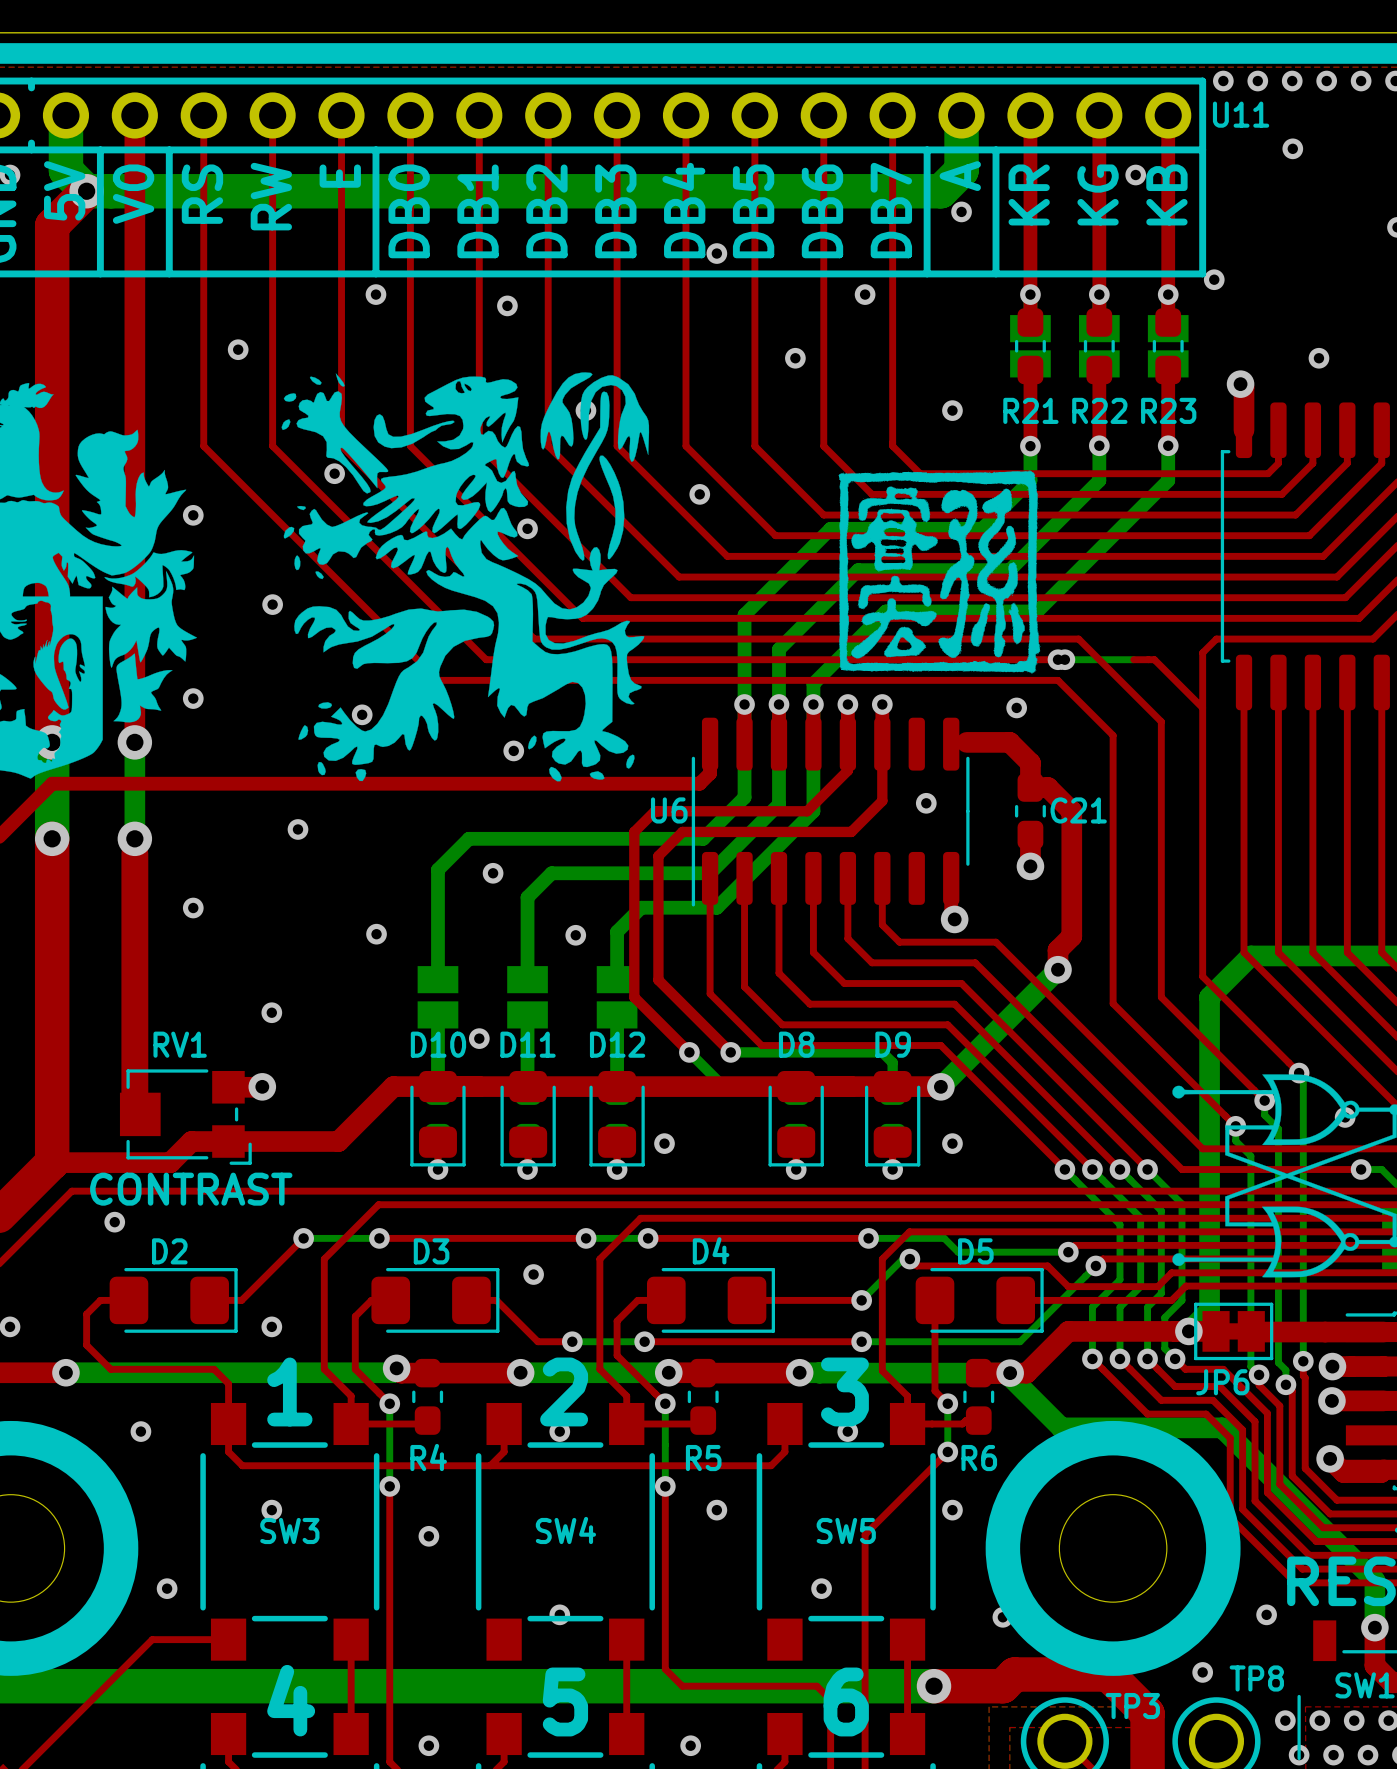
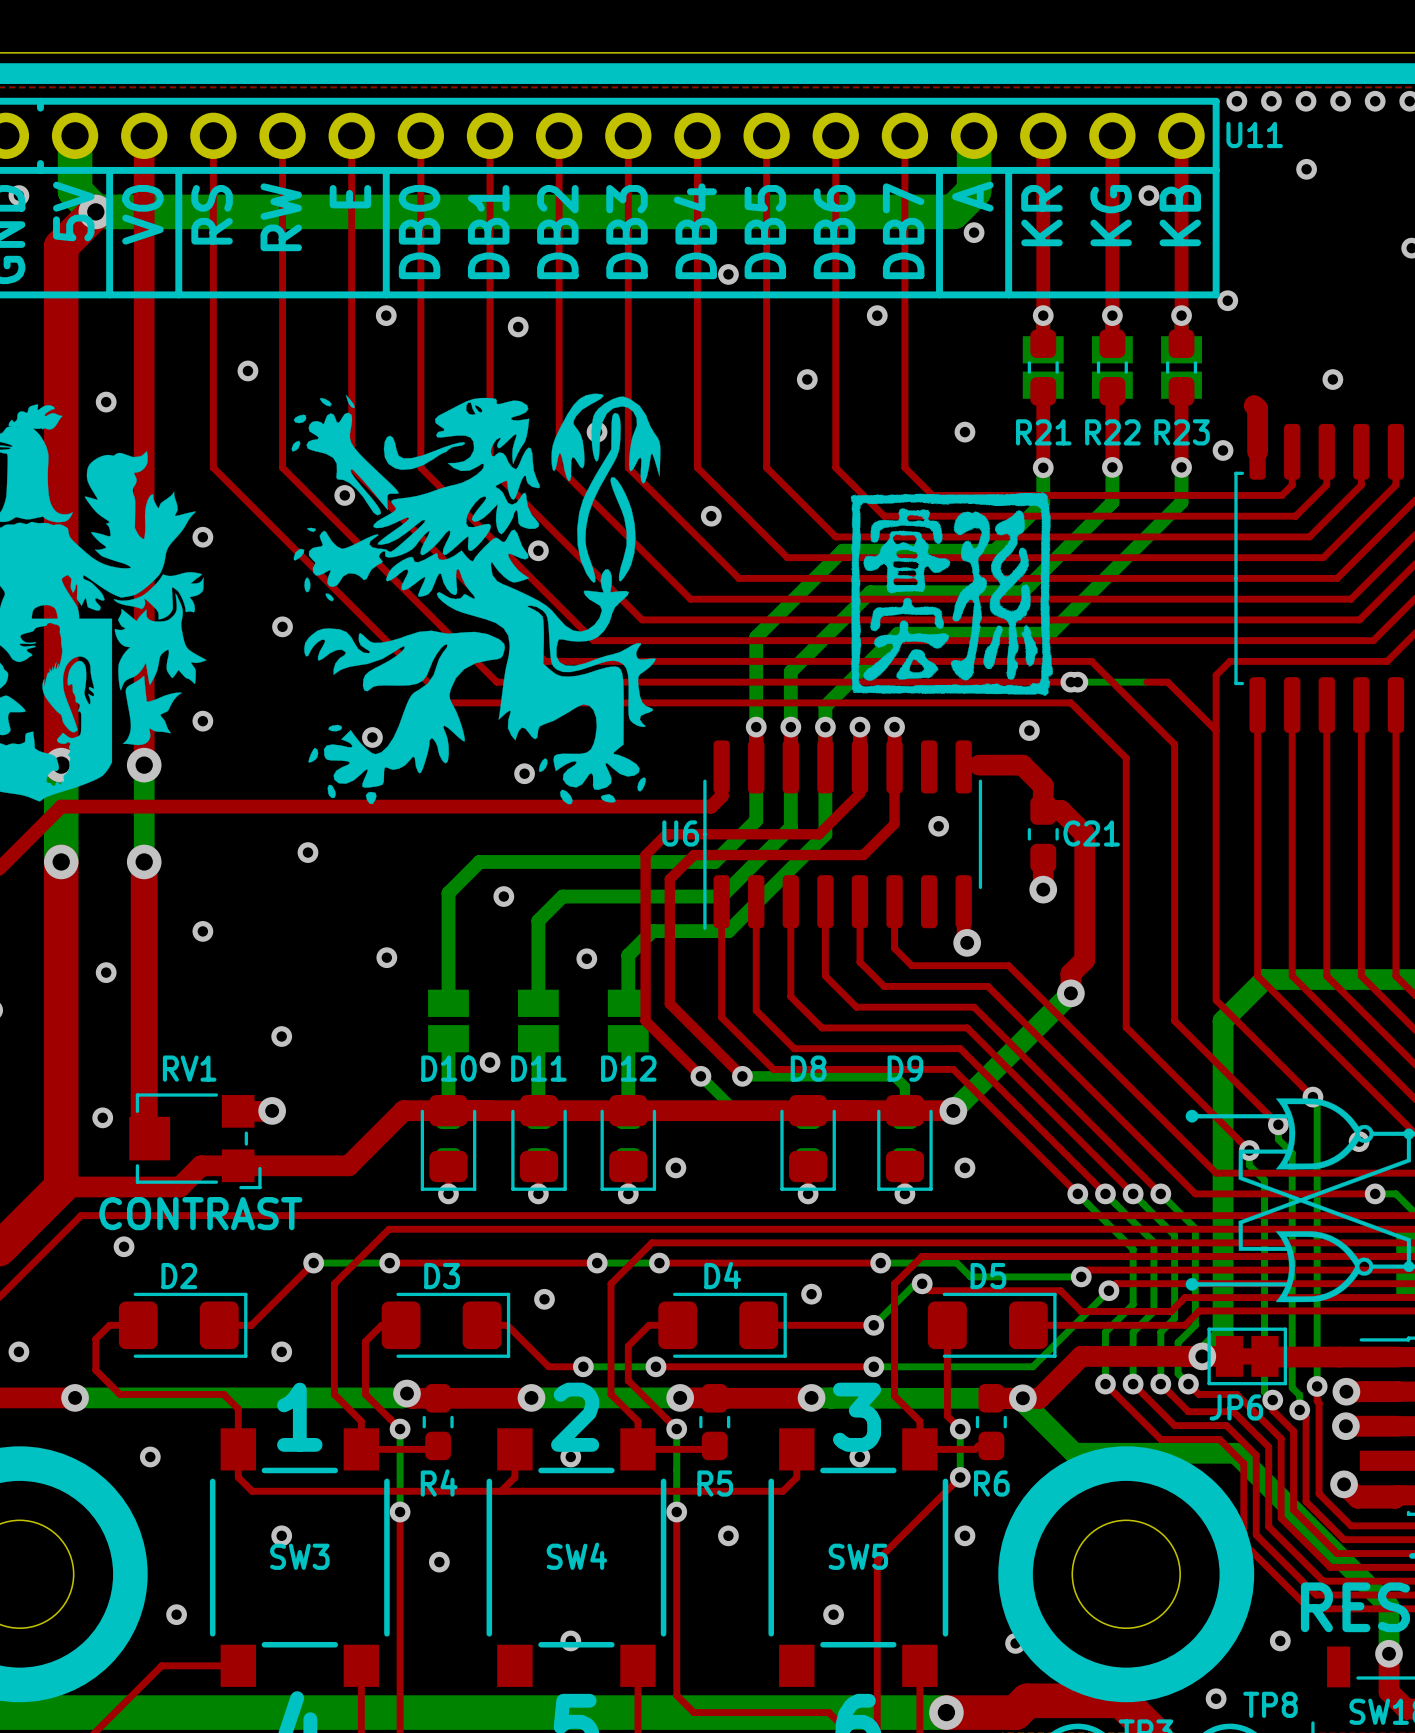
via: none -> (106, 402)
via: (1240, 384) -> none
via: none -> (1223, 450)
via: none -> (106, 972)
via: none -> (102, 1117)
via: none -> (811, 1294)

